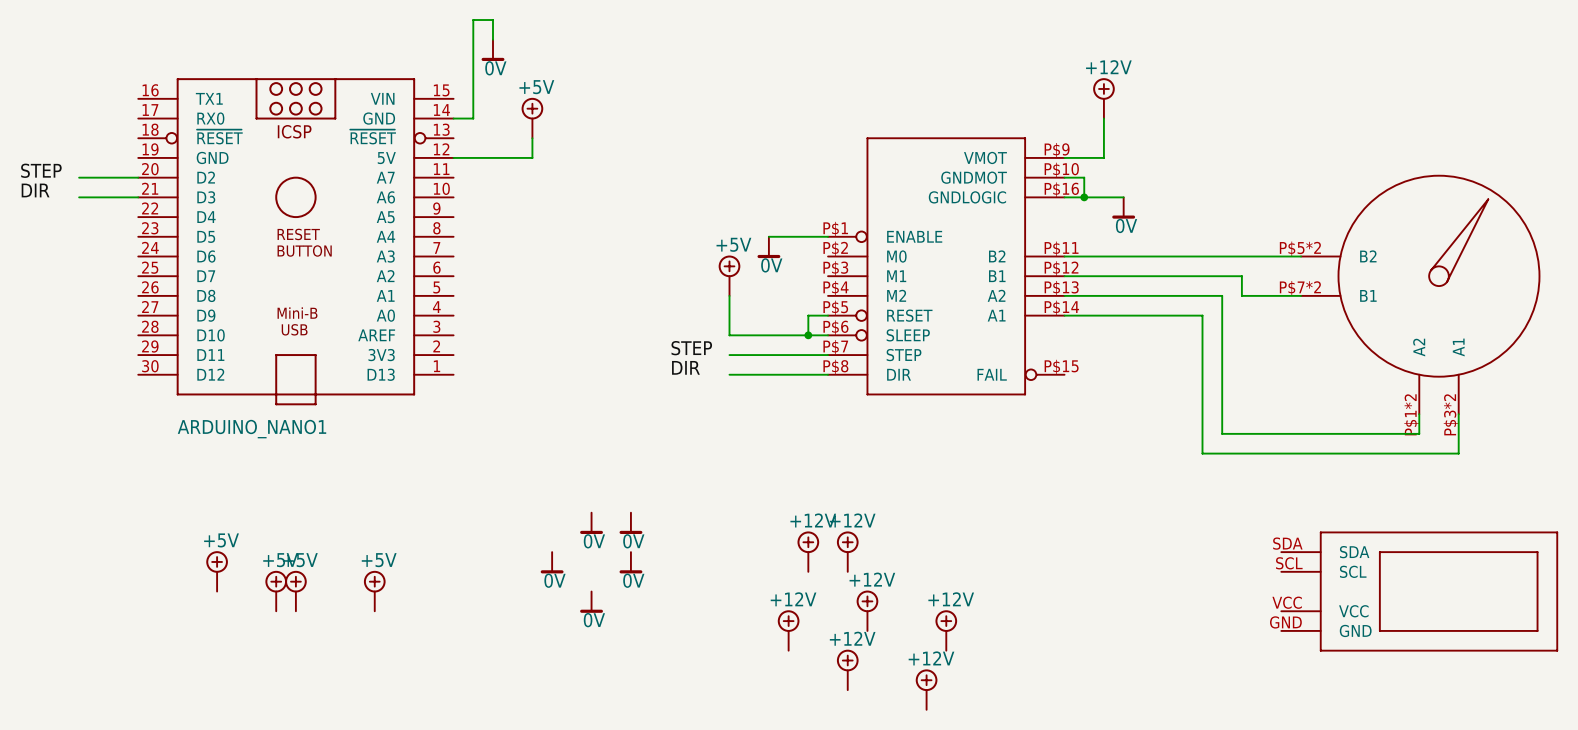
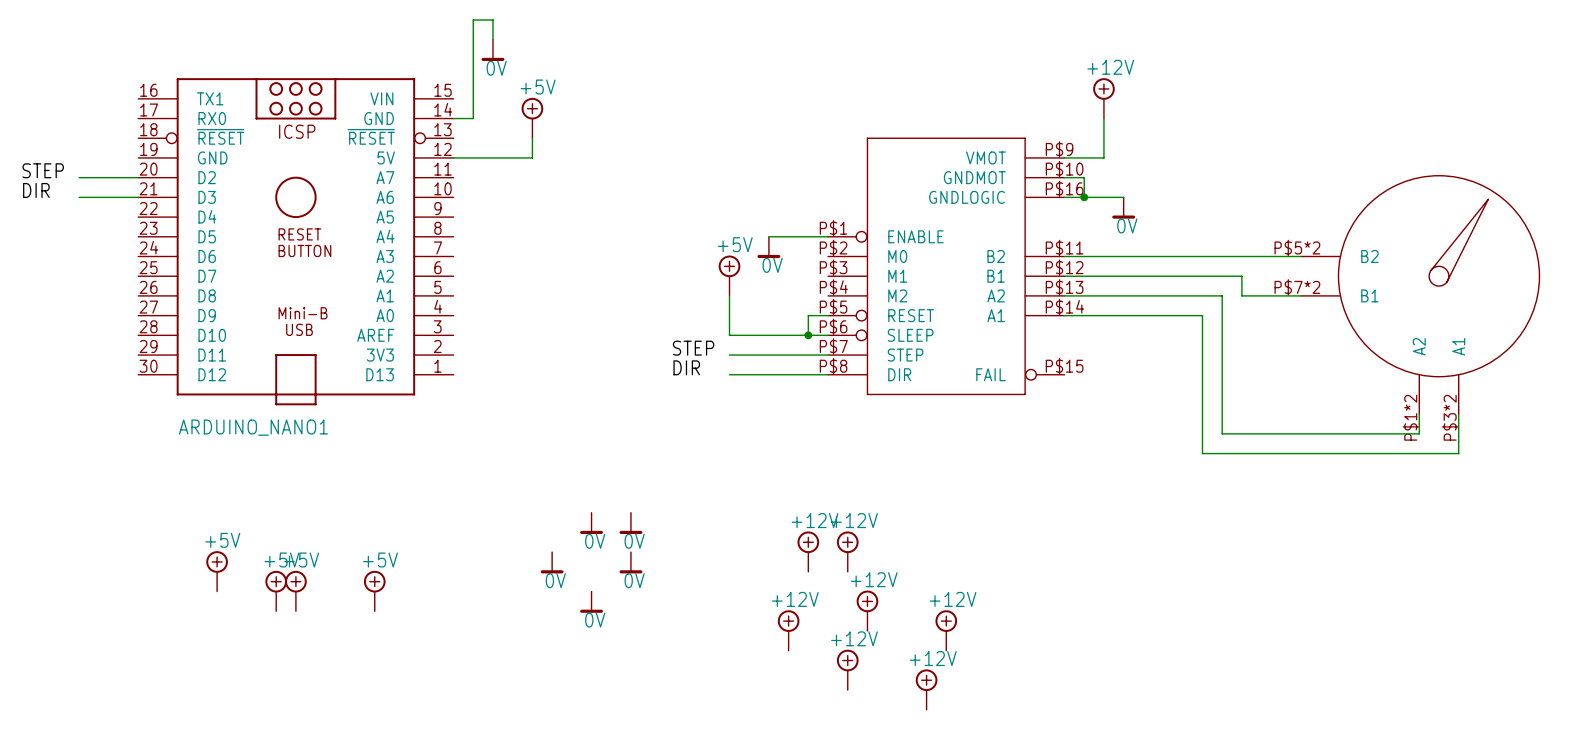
part: (1419, 591) -> none

